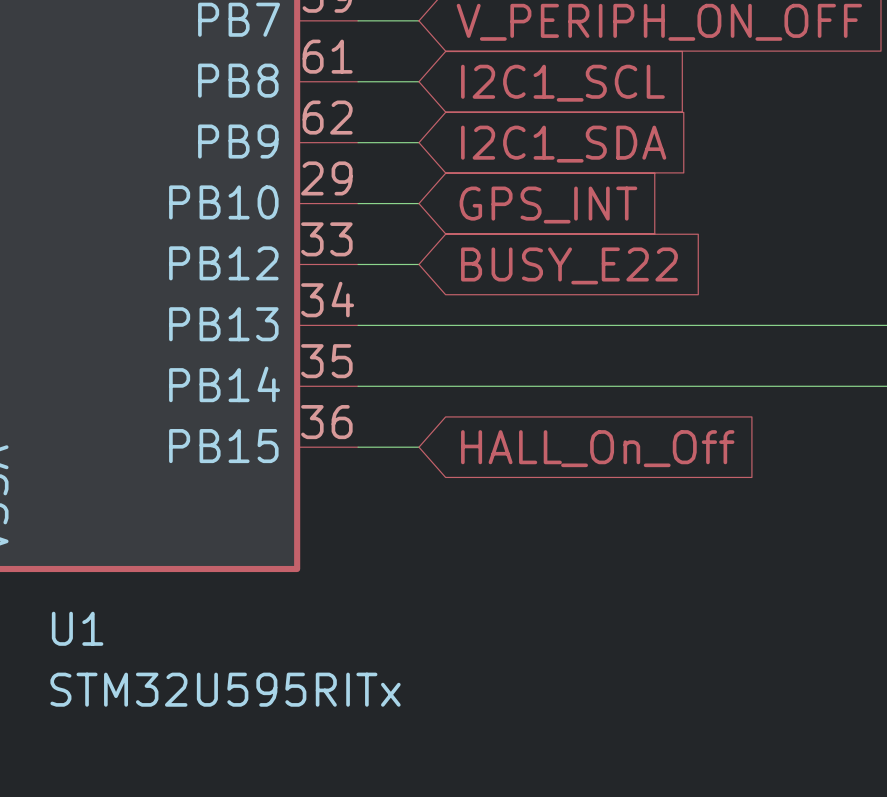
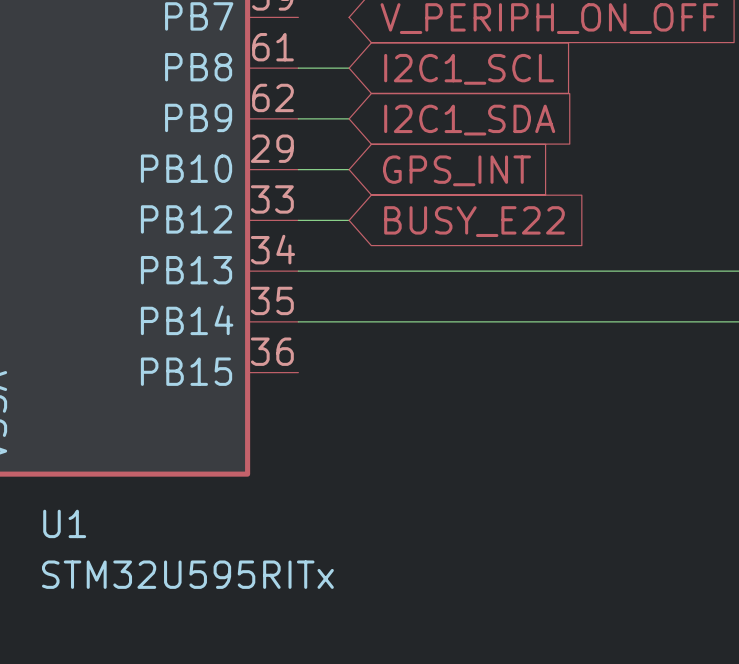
wire: (358, 20) (418, 20) -> none
wire: (358, 447) (418, 447) -> none
global label: HALL_On_Off (597, 448) -> none

